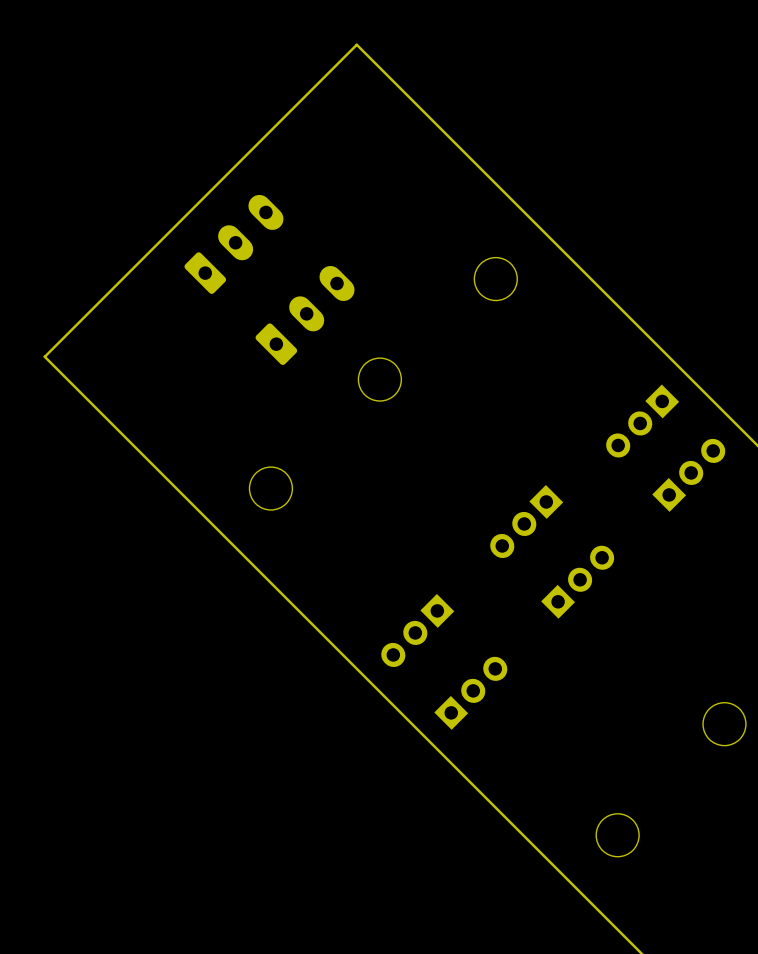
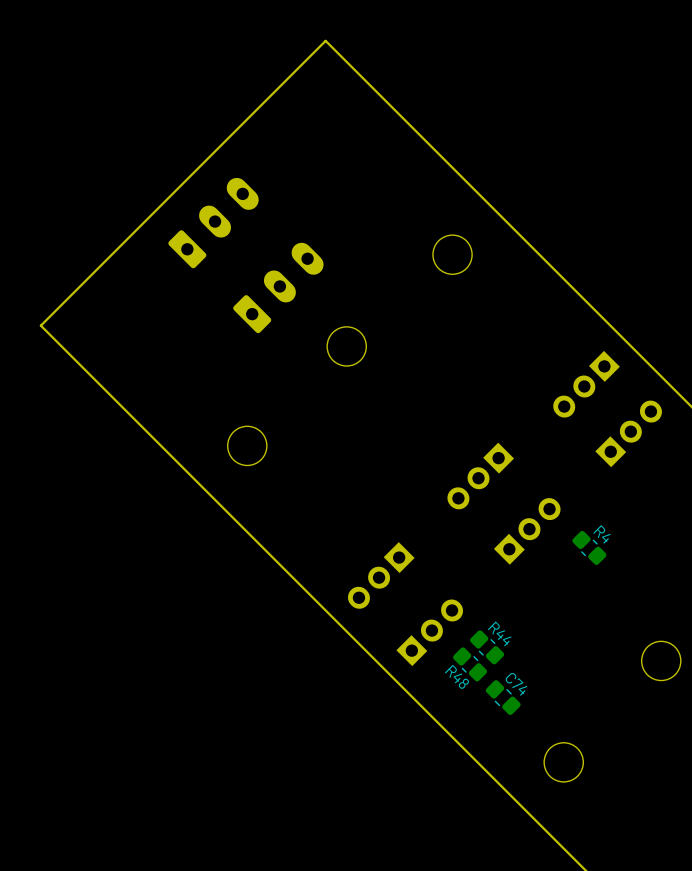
R4: none -> (589, 547)
R44: none -> (487, 647)
R48: none -> (470, 664)
C74: none -> (503, 697)

